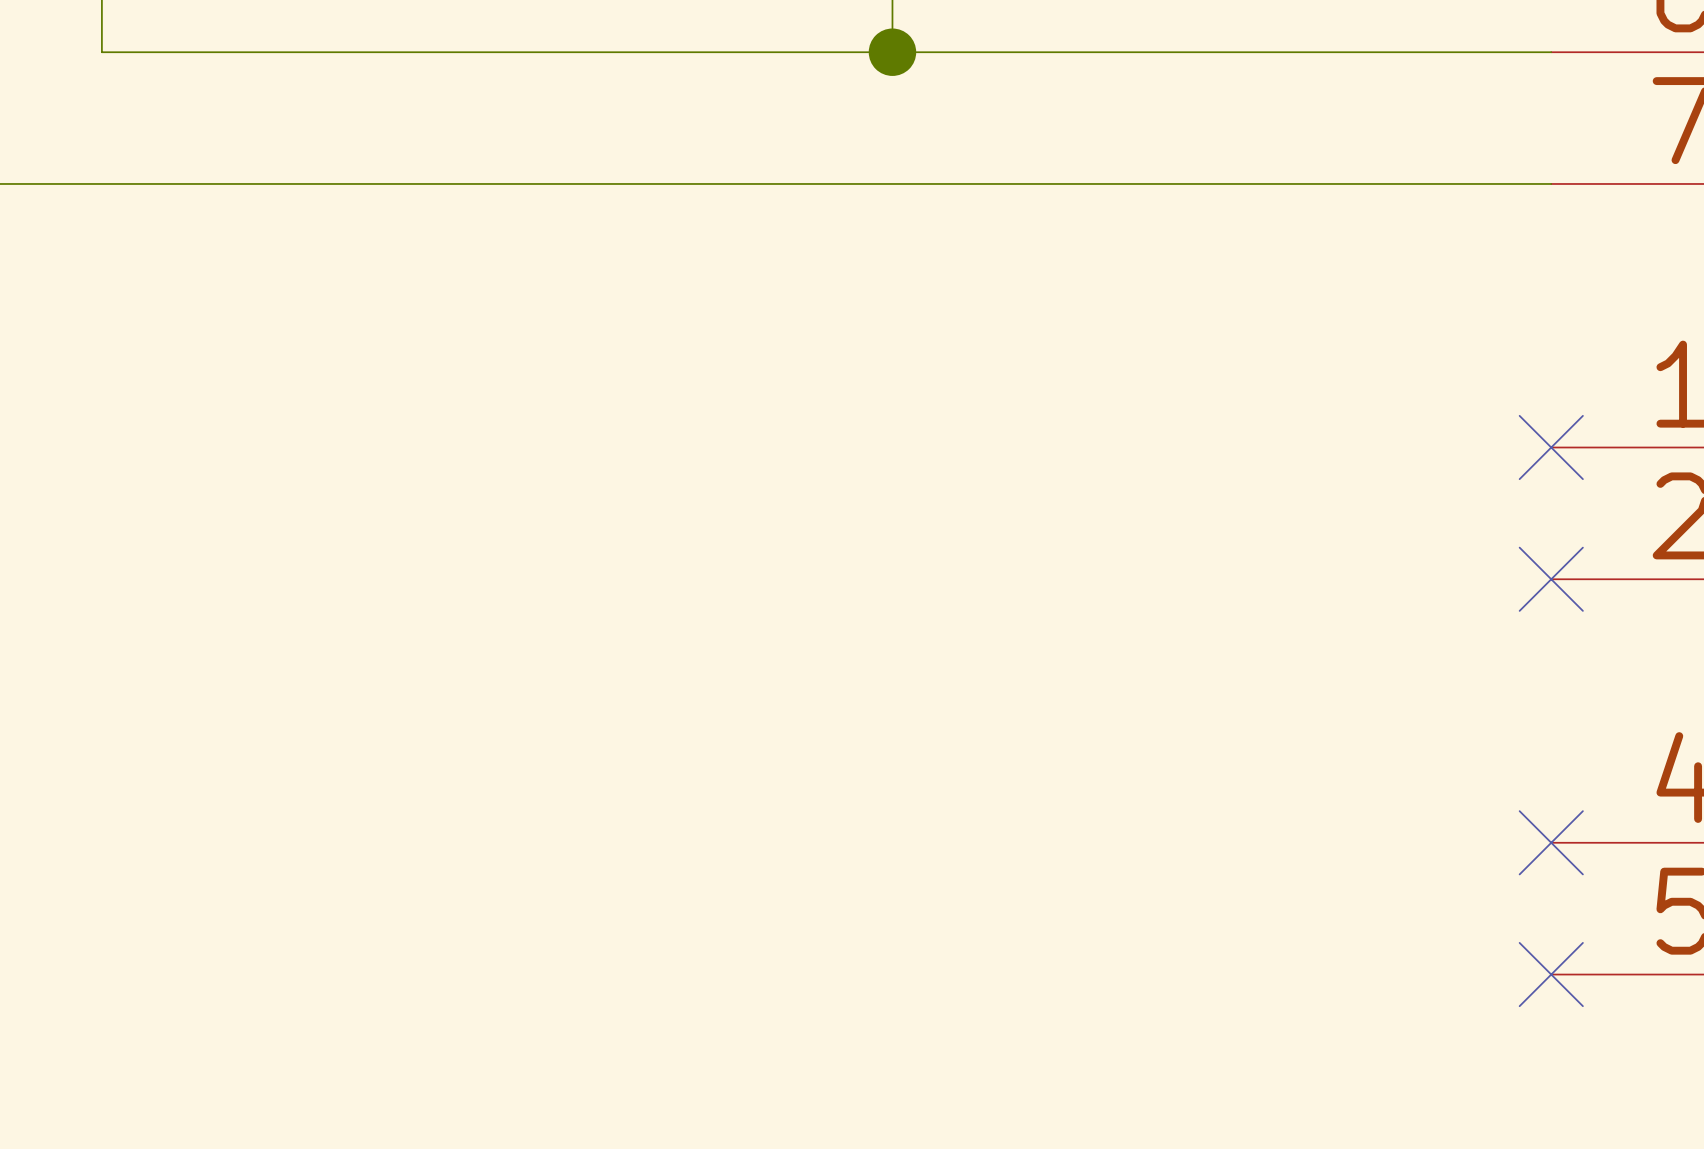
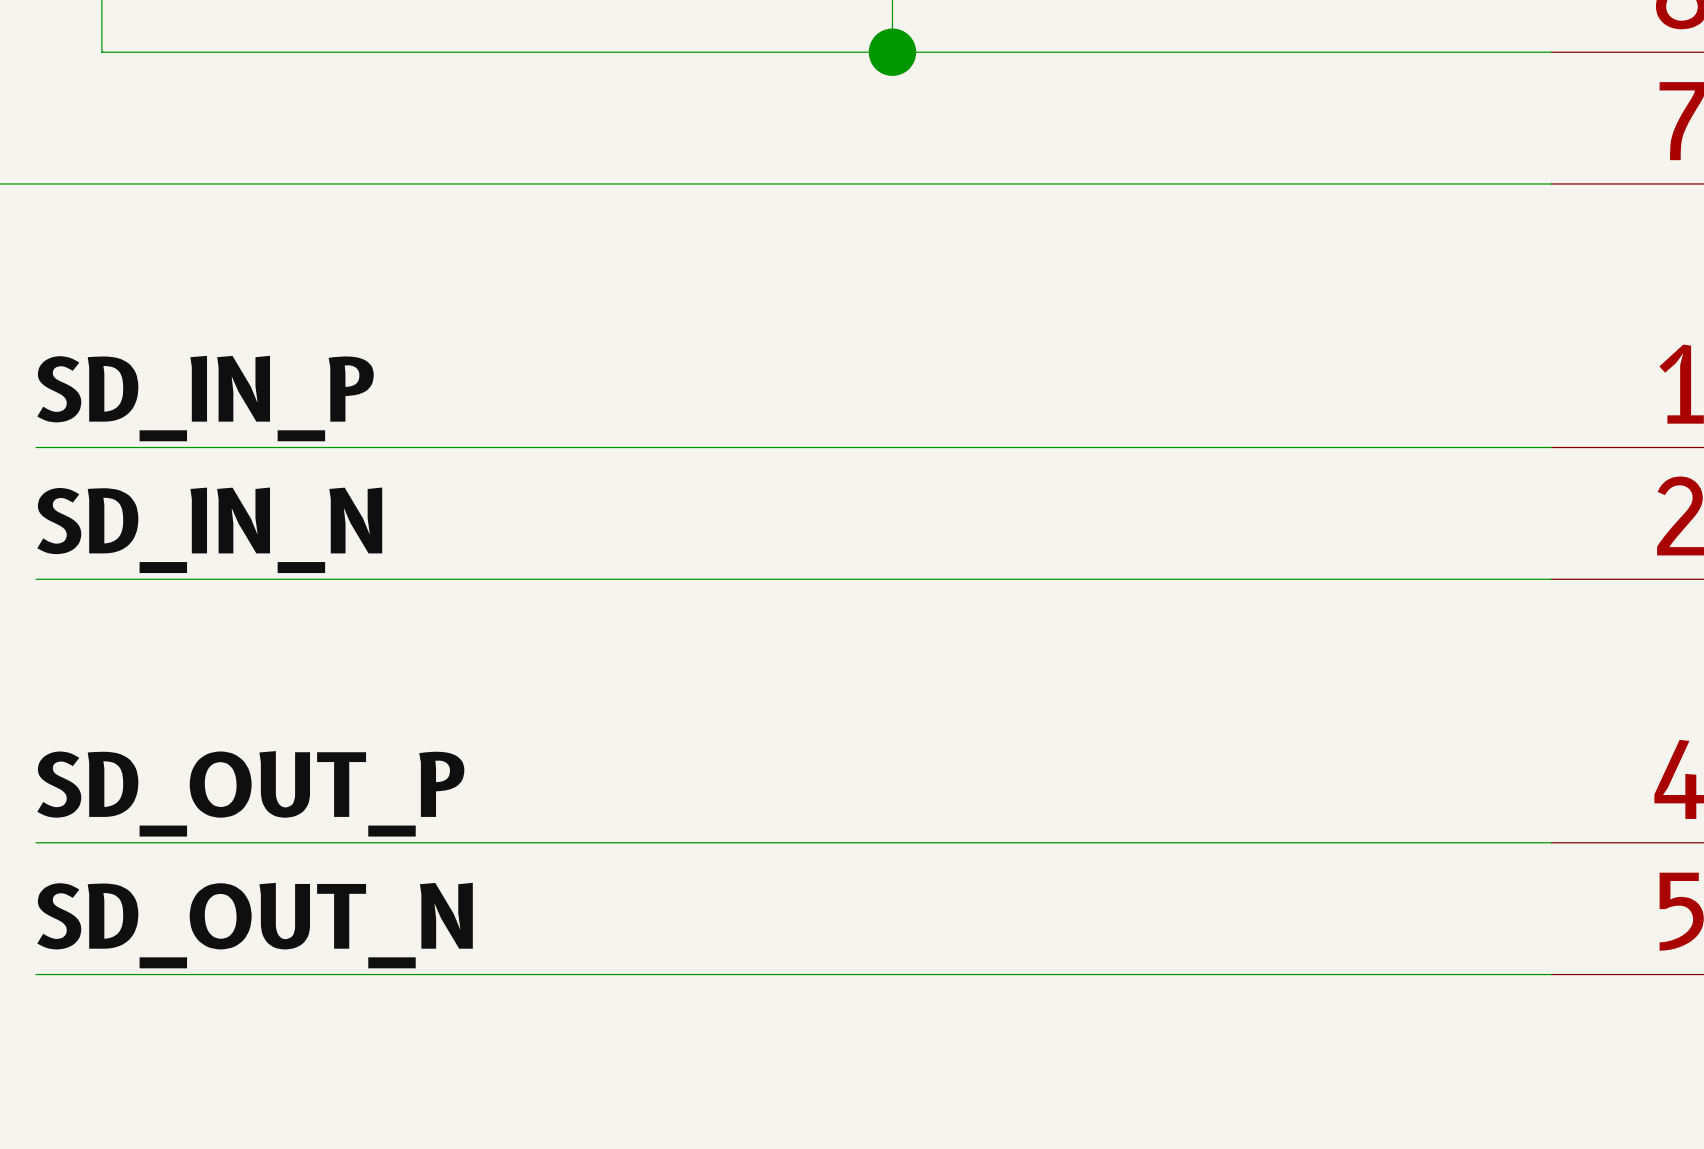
label: none -> SD_IN_P (205, 398)
wire: none -> (36, 447) (1551, 447)
no-connect mark: (1551, 447) -> none
label: none -> SD_IN_N (209, 530)
wire: none -> (36, 579) (1551, 579)
no-connect mark: (1551, 579) -> none
label: none -> SD_OUT_P (250, 793)
wire: none -> (36, 842) (1551, 842)
no-connect mark: (1551, 842) -> none
label: none -> SD_OUT_N (255, 925)
wire: none -> (36, 974) (1551, 974)
no-connect mark: (1551, 974) -> none

